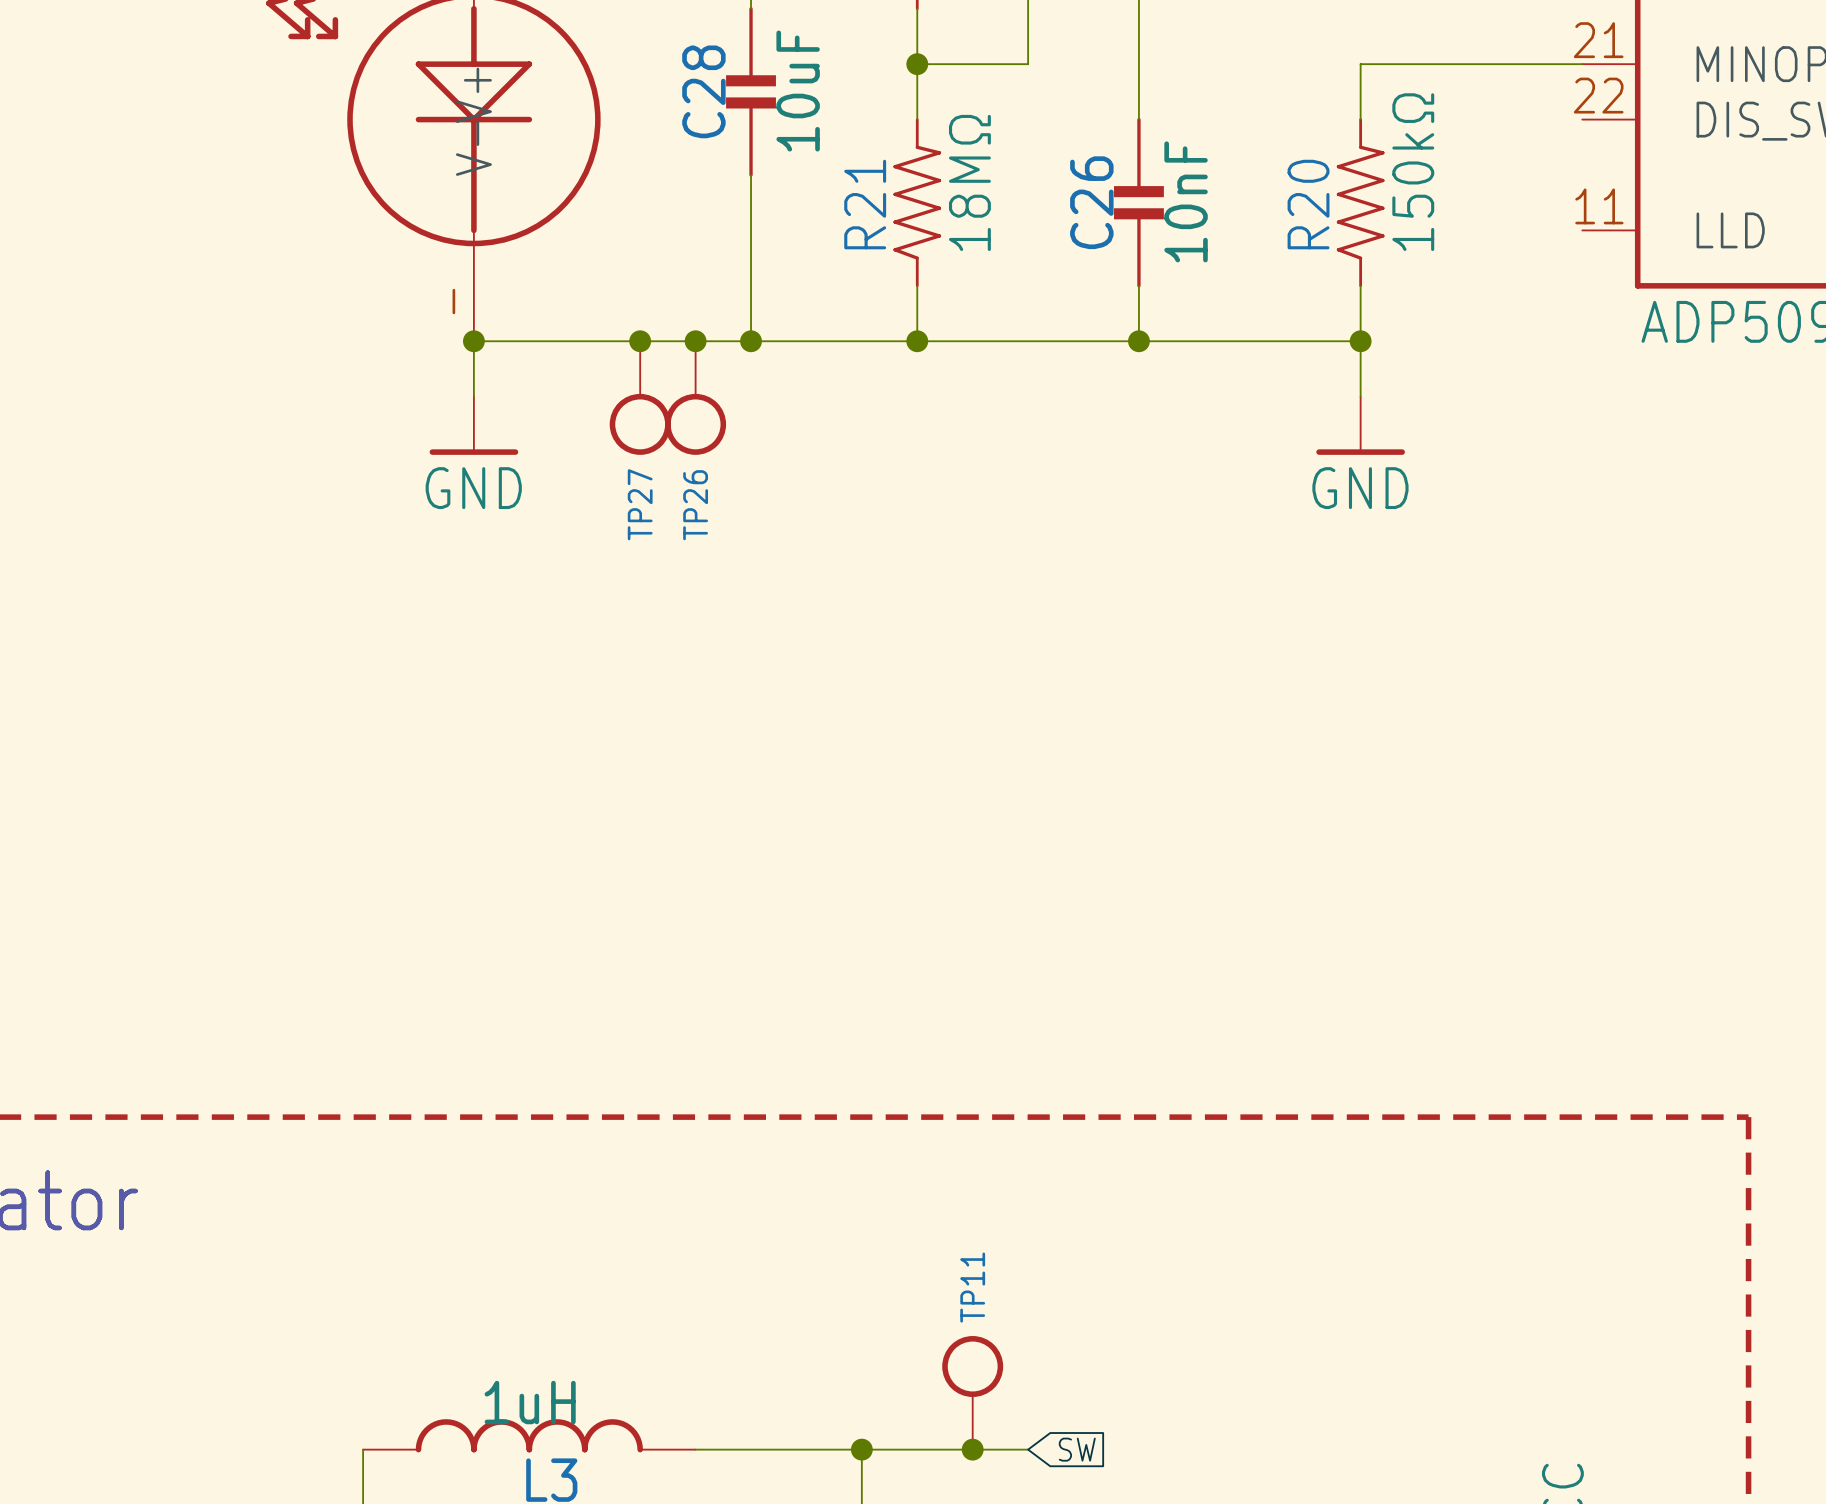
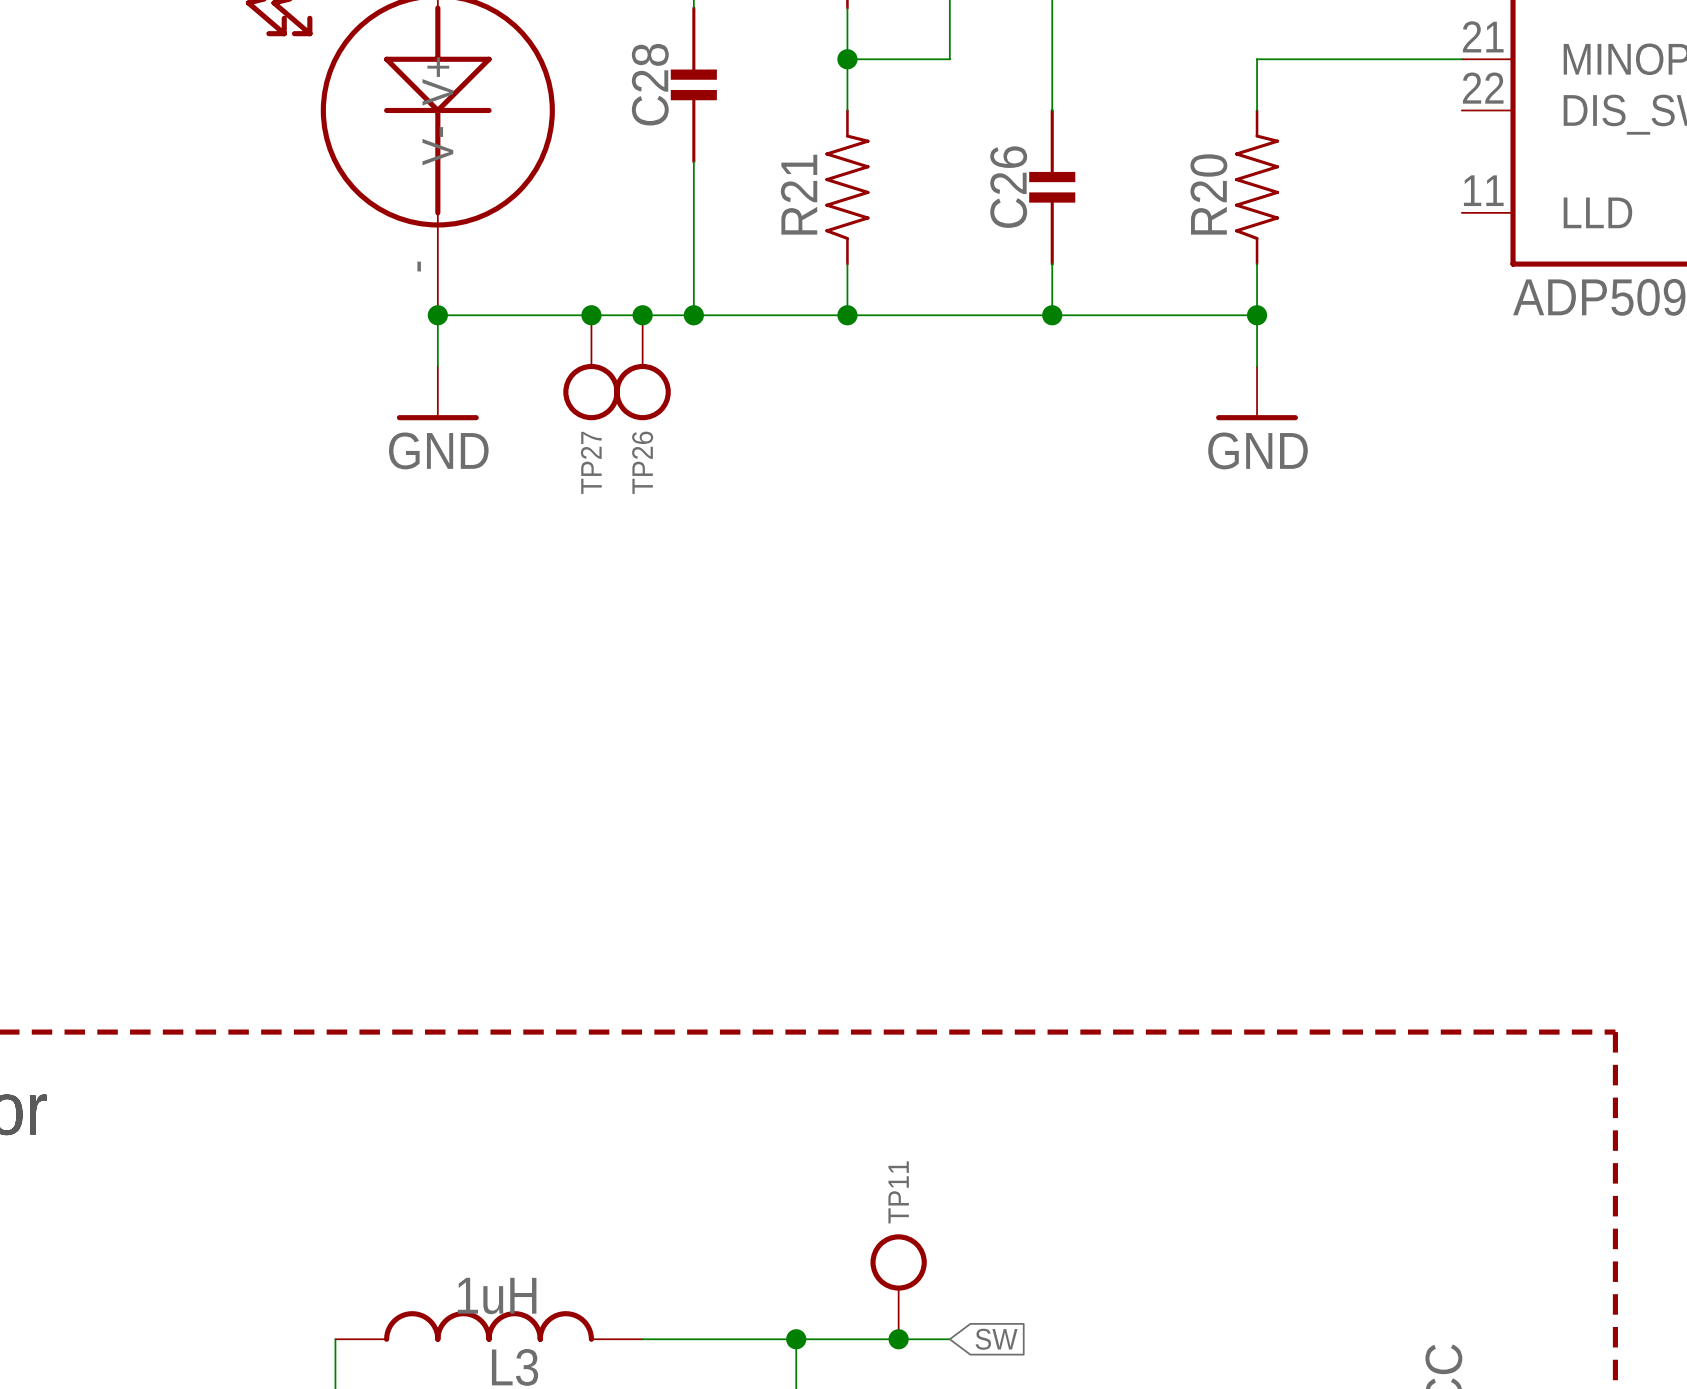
C28 value: 10uF (798, 91) -> none
R20 value: 150kΩ (1413, 172) -> none
R21 value: 18MΩ (969, 182) -> none
C26 value: 10nF (1186, 201) -> none

